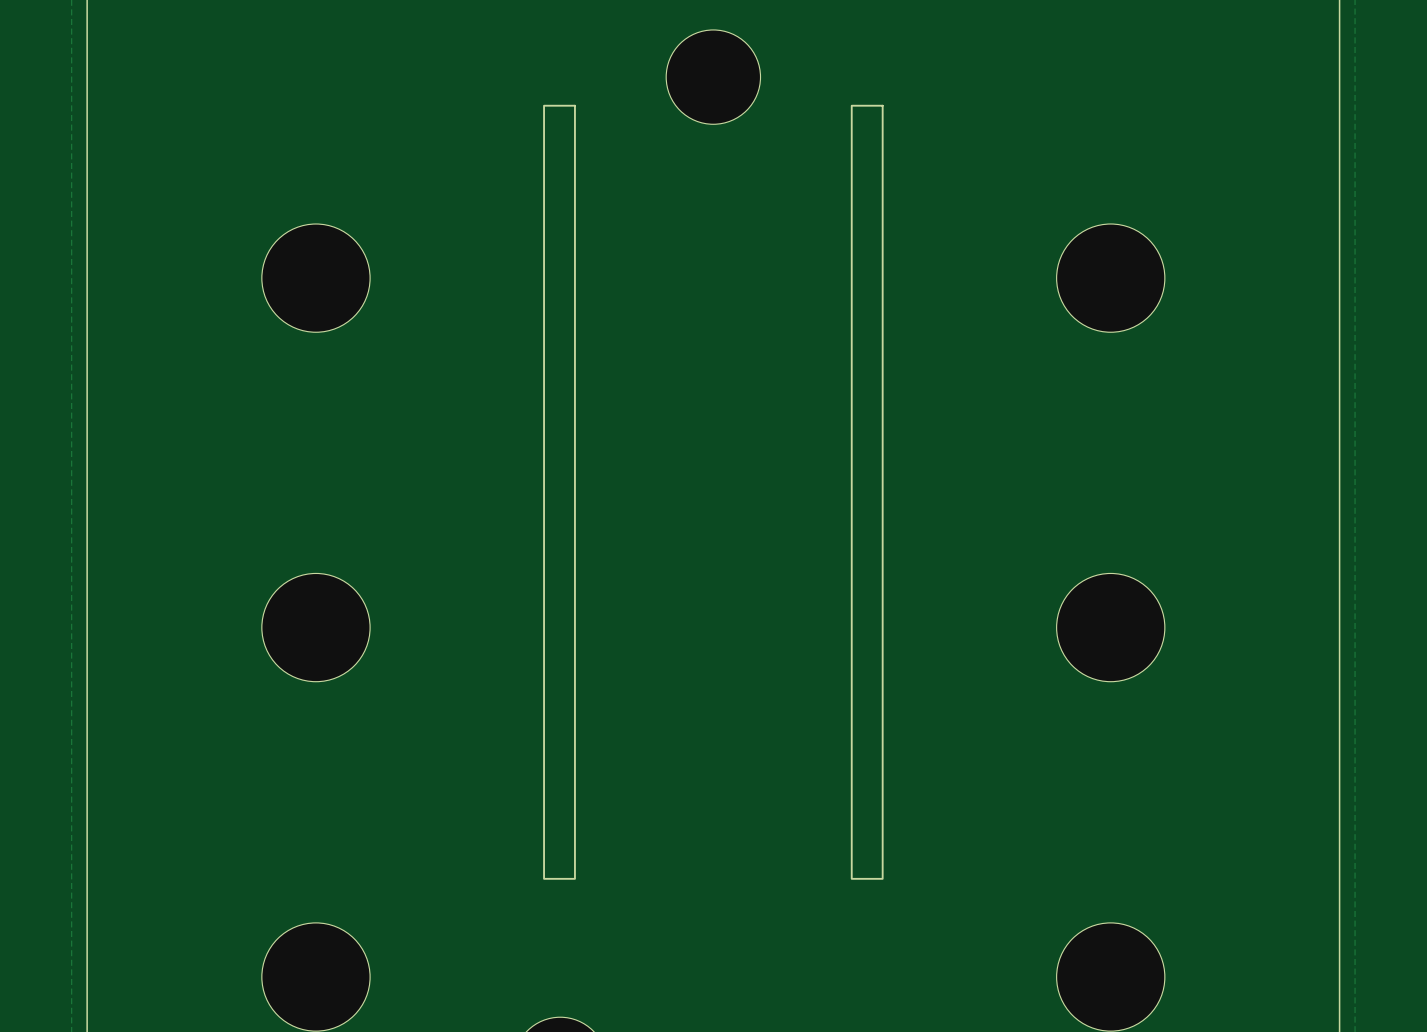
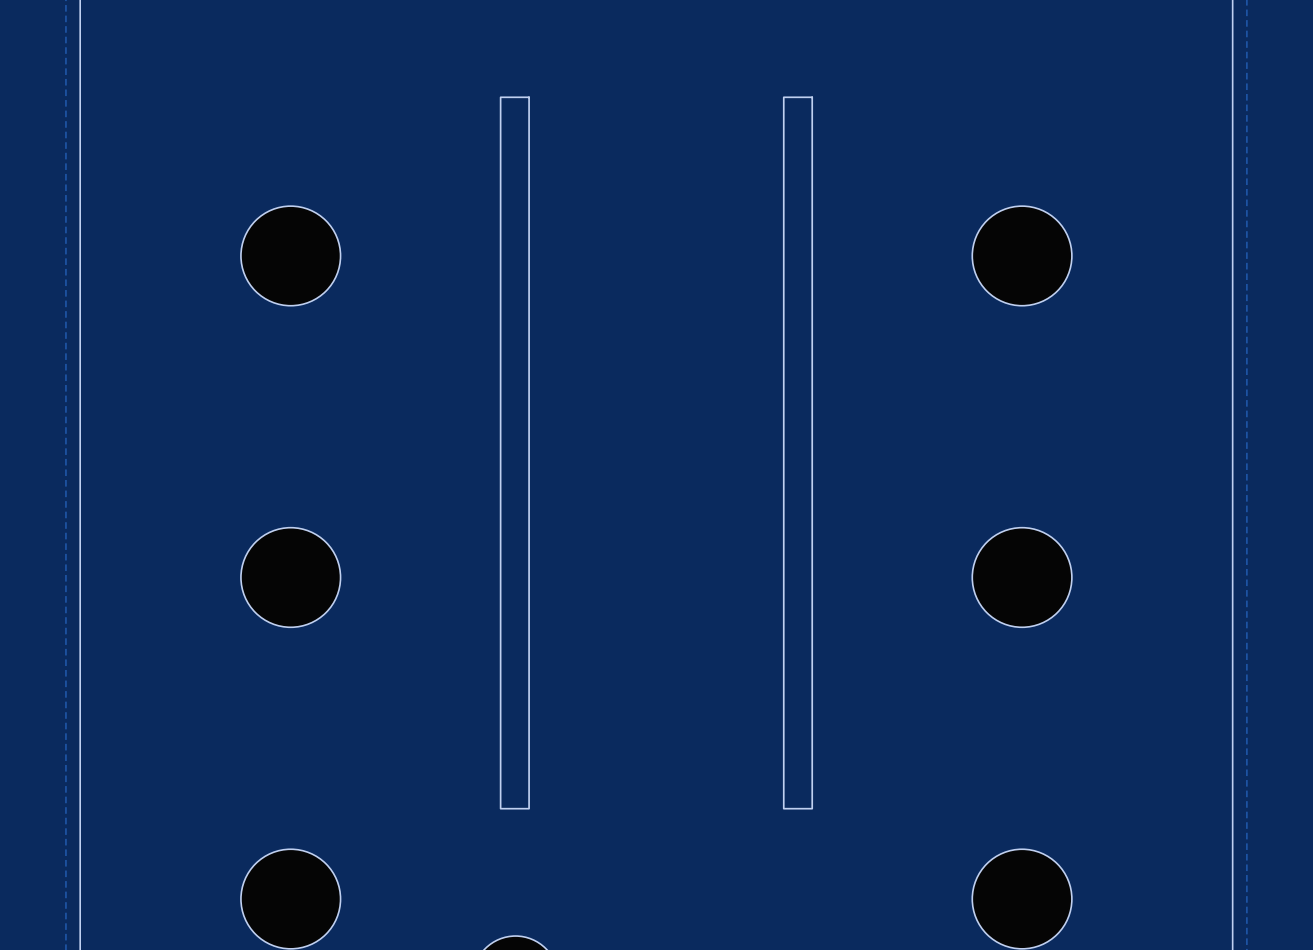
part: (713, 77) -> none

